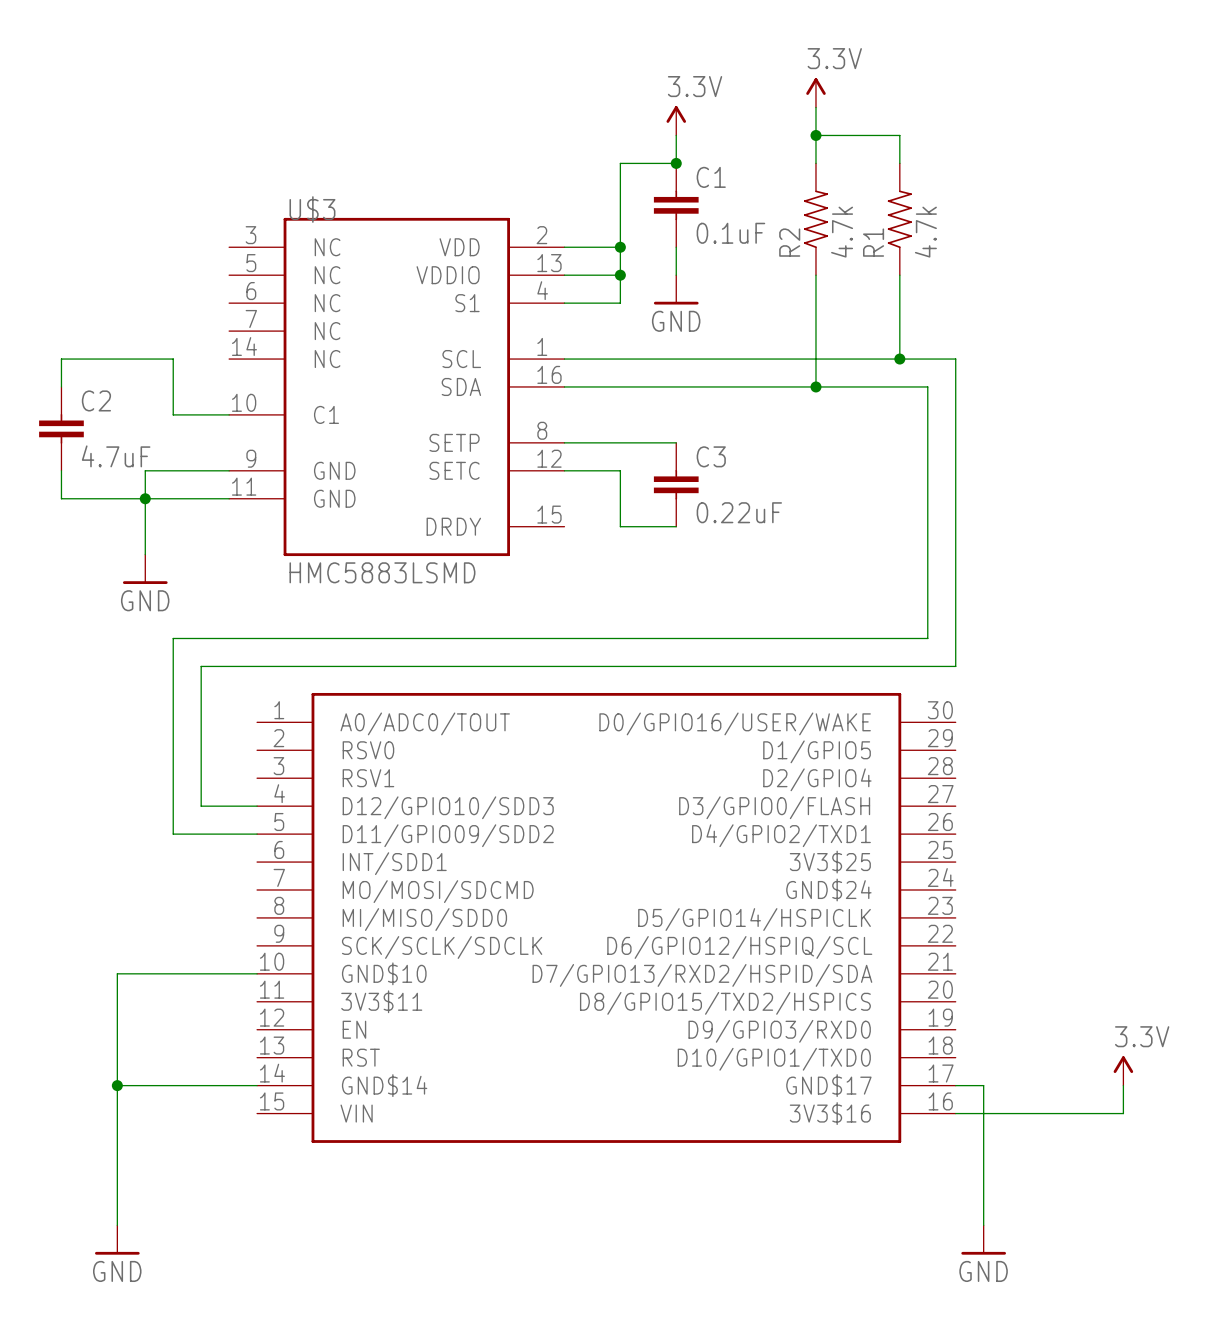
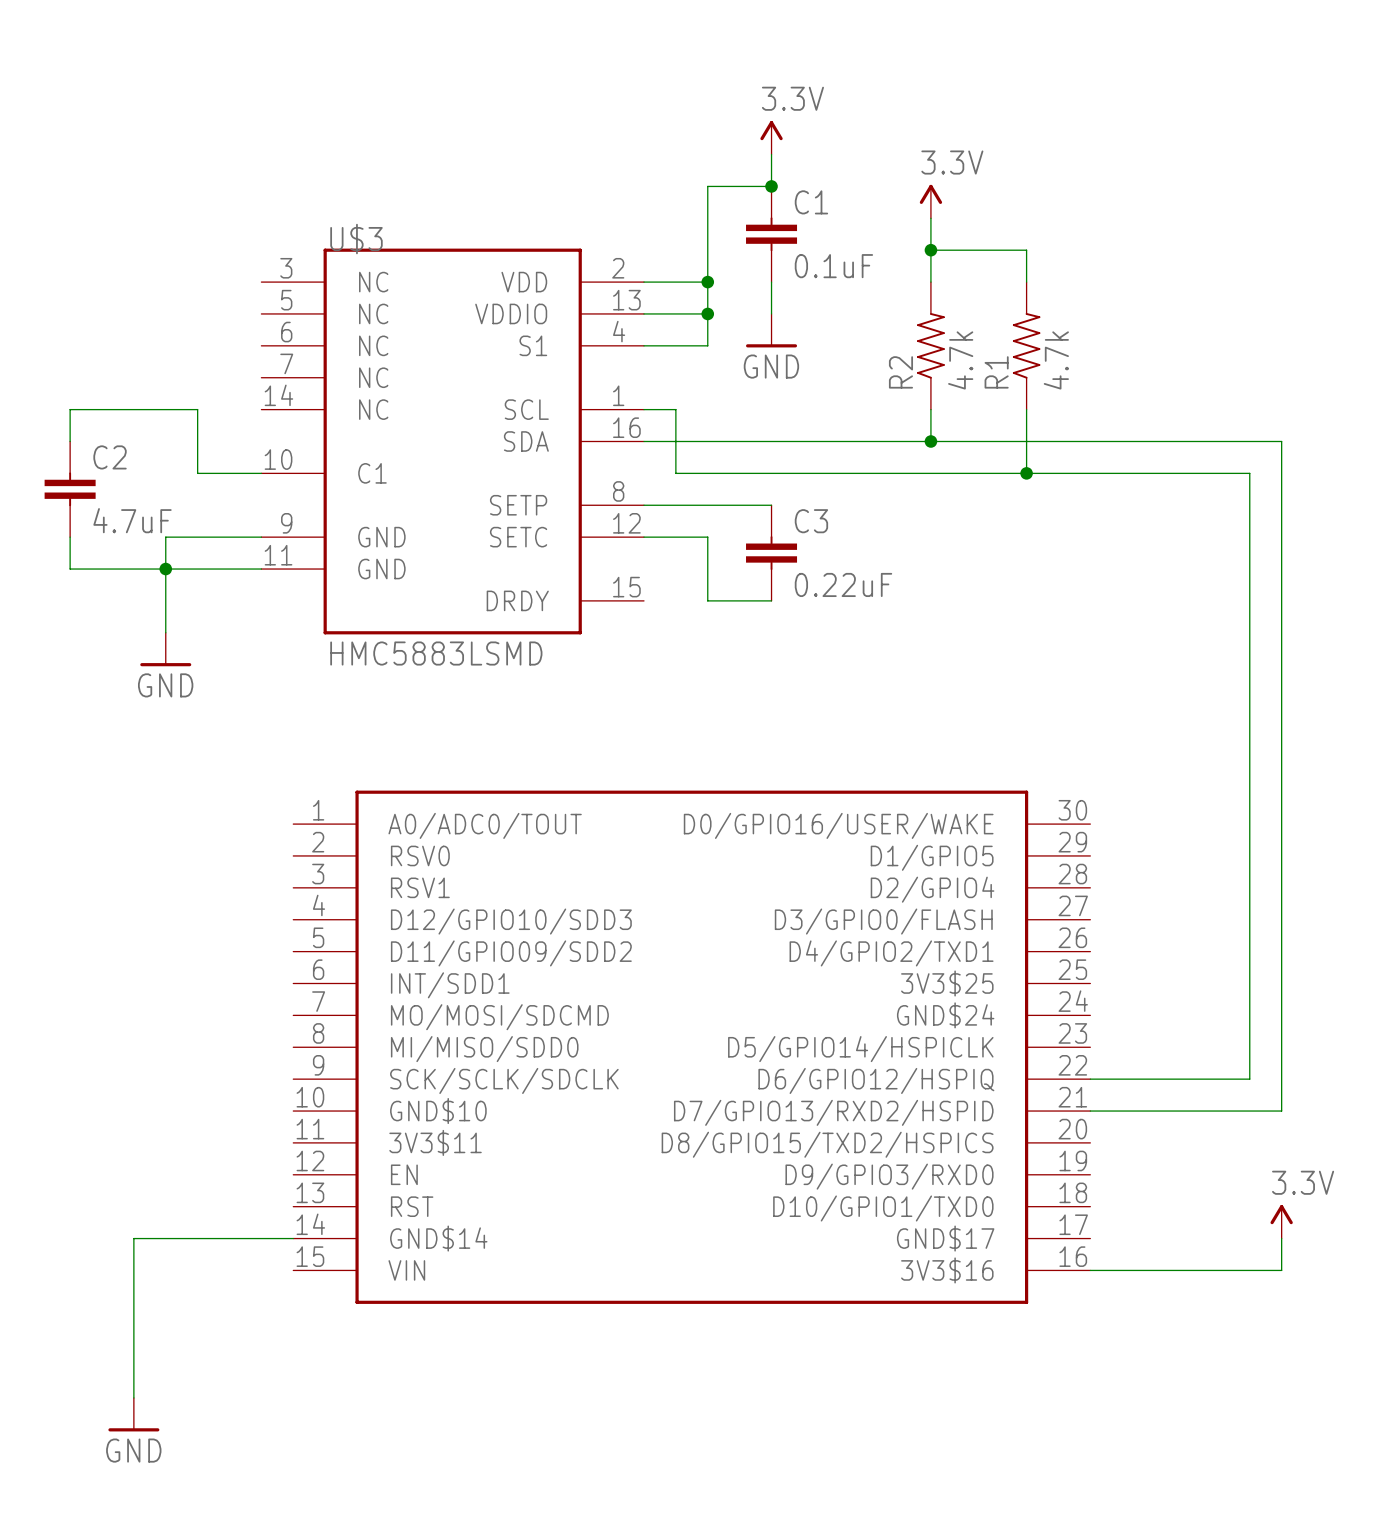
power symbol position: 3.3V (815, 92) -> 3.3V (930, 201)
wire: (815, 107) (815, 163) -> (930, 218) (930, 282)
wire: (815, 135) (899, 135) (899, 163) -> (930, 250) (1026, 250) (1026, 282)
junction: (815, 135) -> none
R2 position: (815, 219) -> (930, 345)
junction: none -> (930, 250)
R1 position: (899, 219) -> (1026, 345)
wire: (815, 275) (815, 359) -> none
wire: (899, 275) (899, 359) -> (1026, 473) (1026, 409)
wire: (592, 359) (955, 359) (955, 666) (201, 666) (201, 806) (257, 806) -> (675, 409) (675, 473) (1249, 473) (1249, 1079) (1090, 1079)
junction position: (899, 359) -> (1026, 473)
wire: (927, 386) (927, 638) (173, 638) (173, 834) (257, 834) -> (1058, 441) (1281, 441) (1281, 1111) (1090, 1111)
part pin name: D6/GPIO12/HSPIQ/SCL (739, 947) -> D6/GPIO12/HSPIQ (876, 1080)
wire: (257, 973) (117, 973) (117, 1085) -> none
part pin name: D7/GPIO13/RXD2/HSPID/SDA (702, 975) -> D7/GPIO13/RXD2/HSPID (833, 1112)
junction: (117, 1085) -> none
wire: (955, 1085) (983, 1085) (983, 1225) -> none
power symbol: GND (983, 1240) -> none

